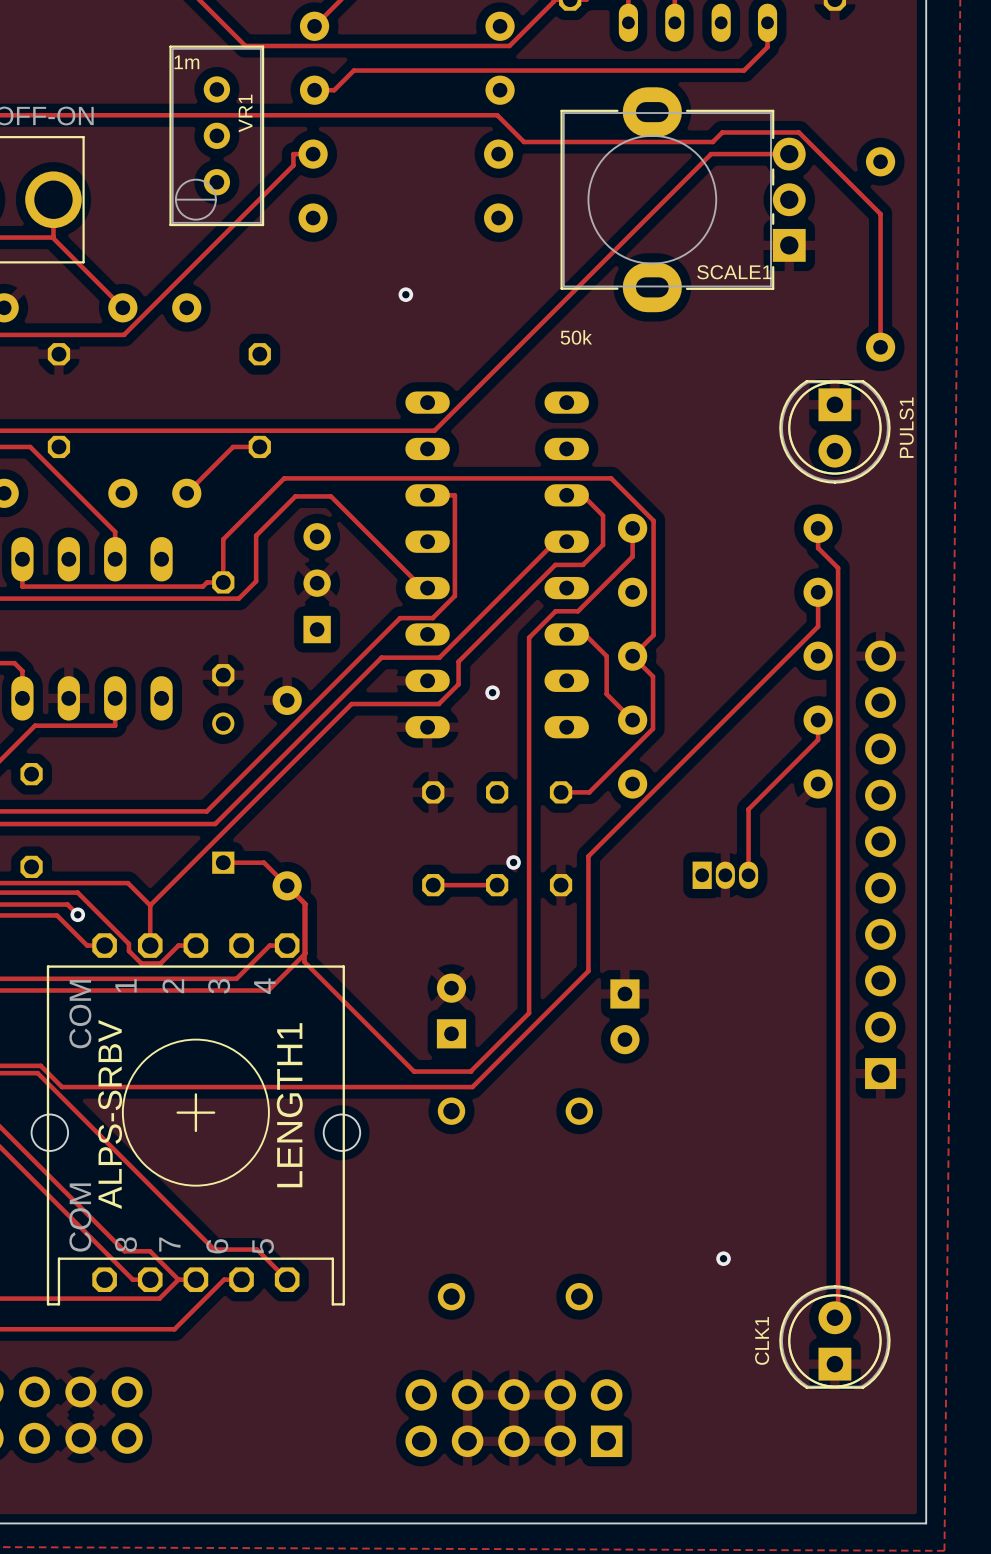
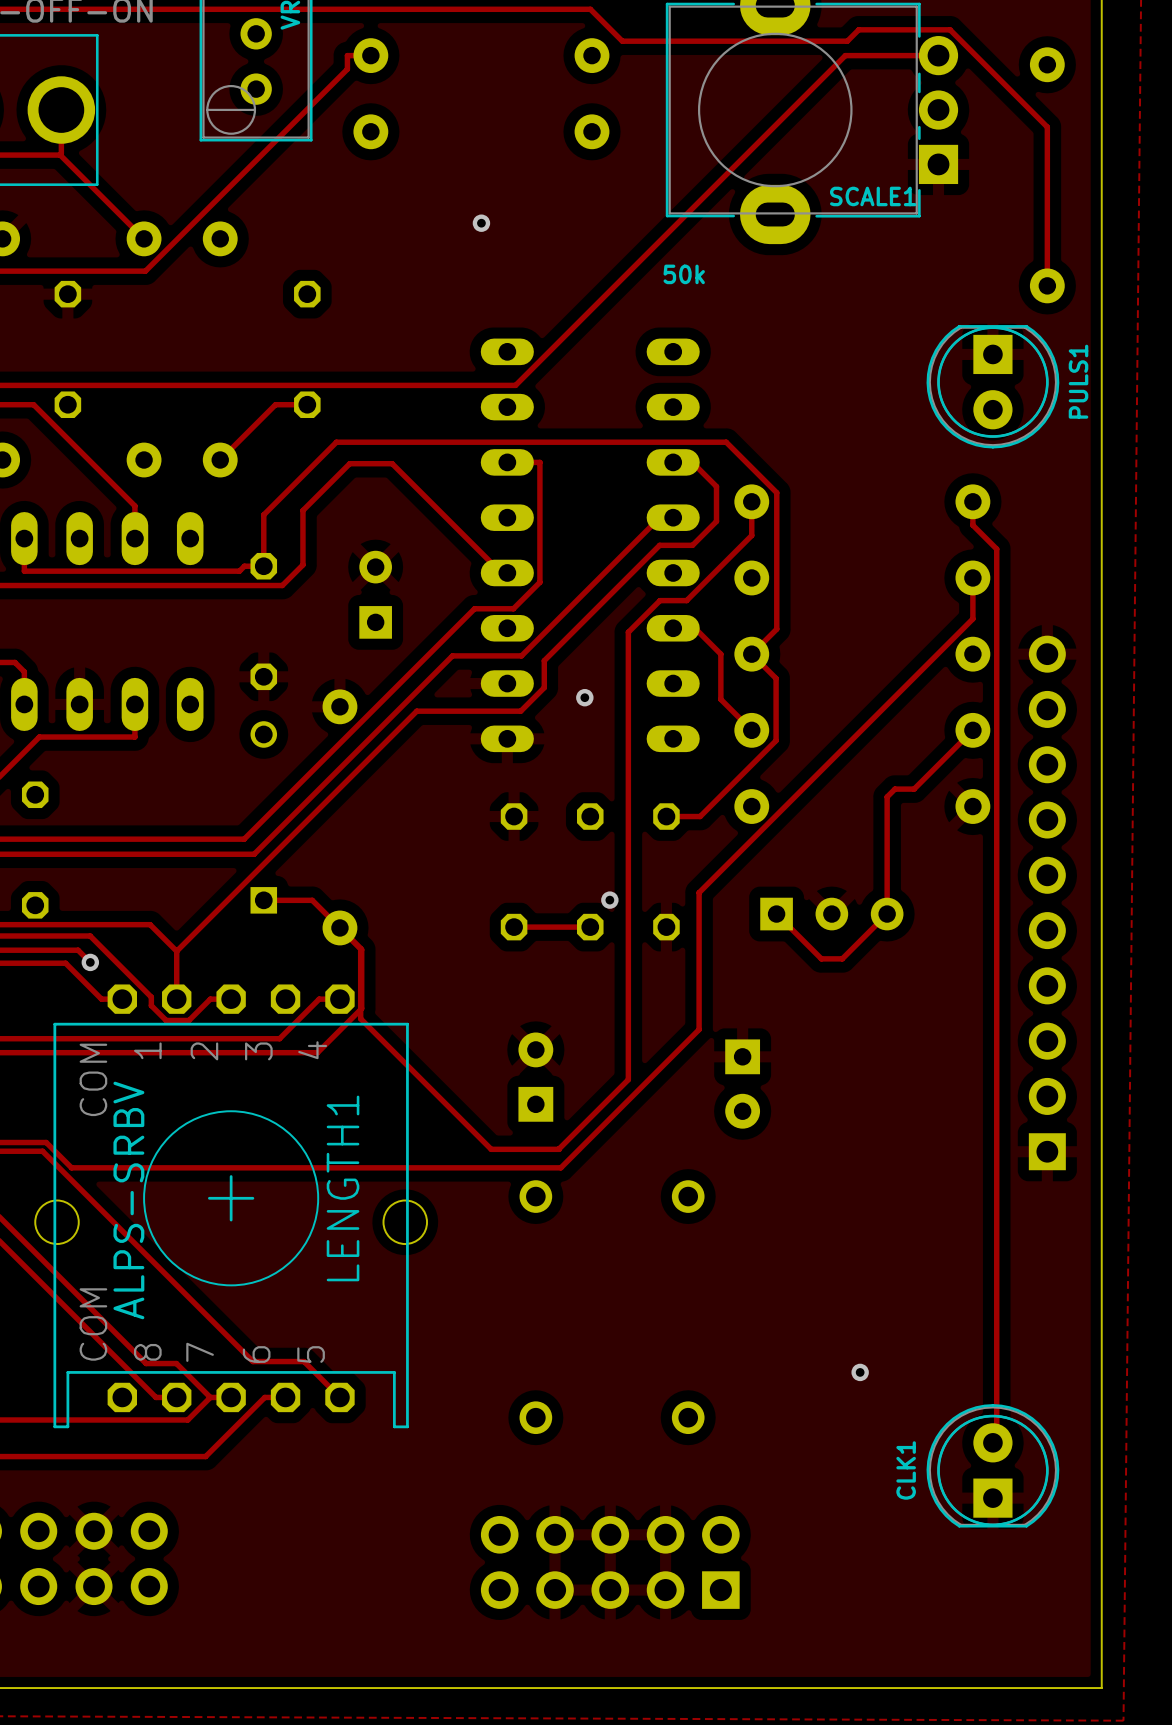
part: (317, 583) -> none
track: (818, 720) (818, 739) (748, 809) (748, 875) -> (972, 730) (914, 789) (894, 789) (887, 796) (887, 914) (842, 958) (821, 958) (776, 914)
part: none -> (831, 914)
part: (725, 875) -> none

